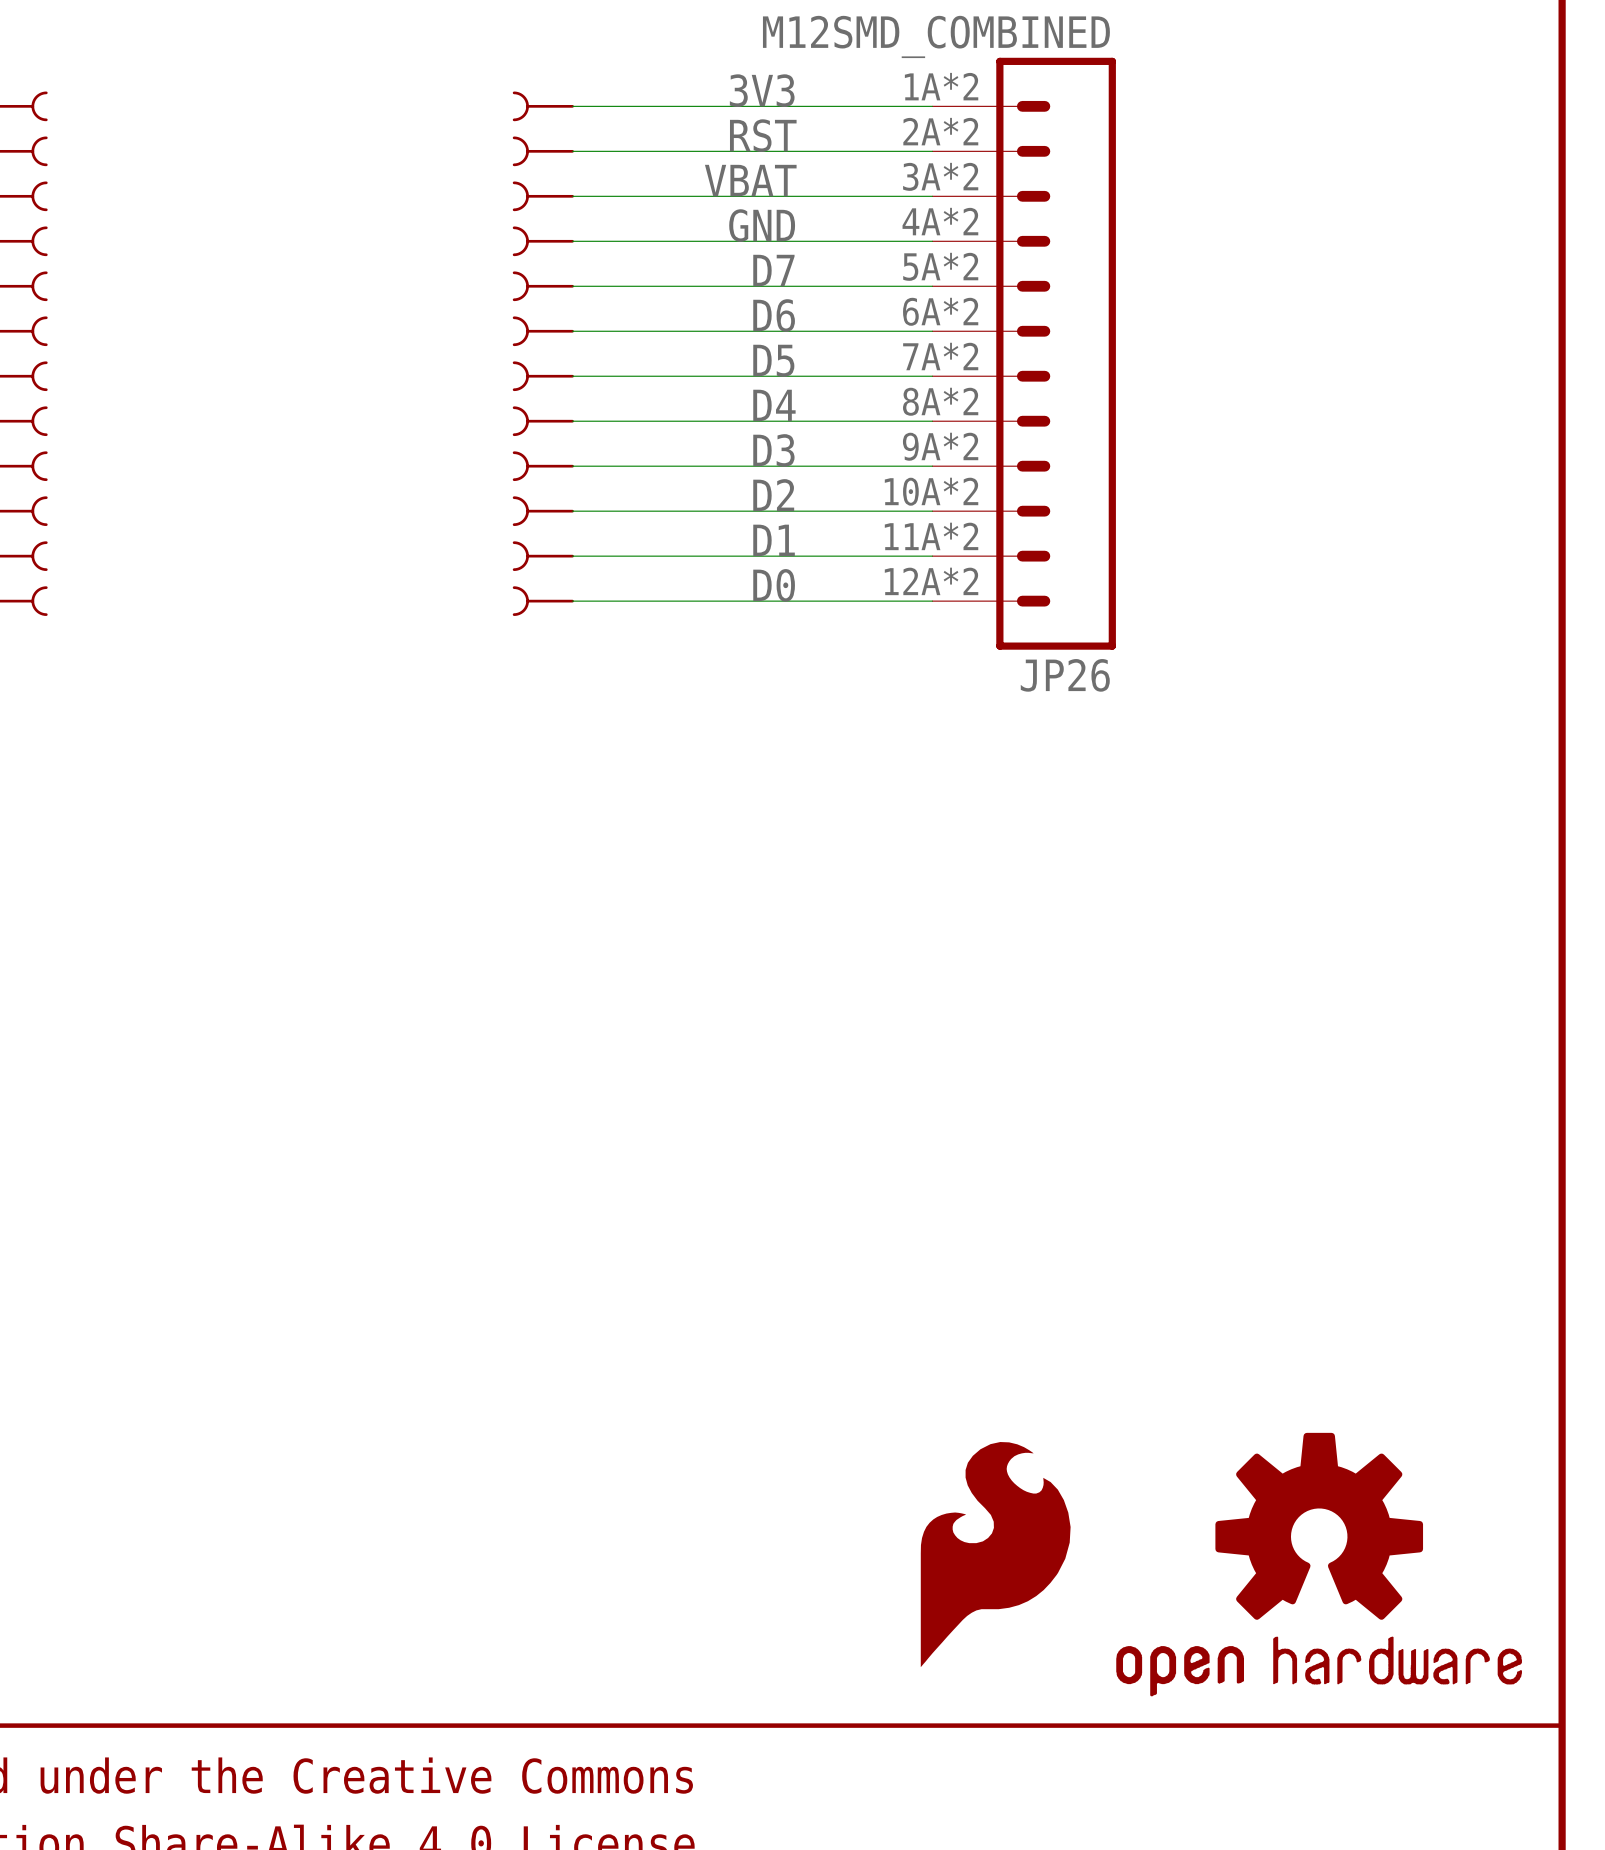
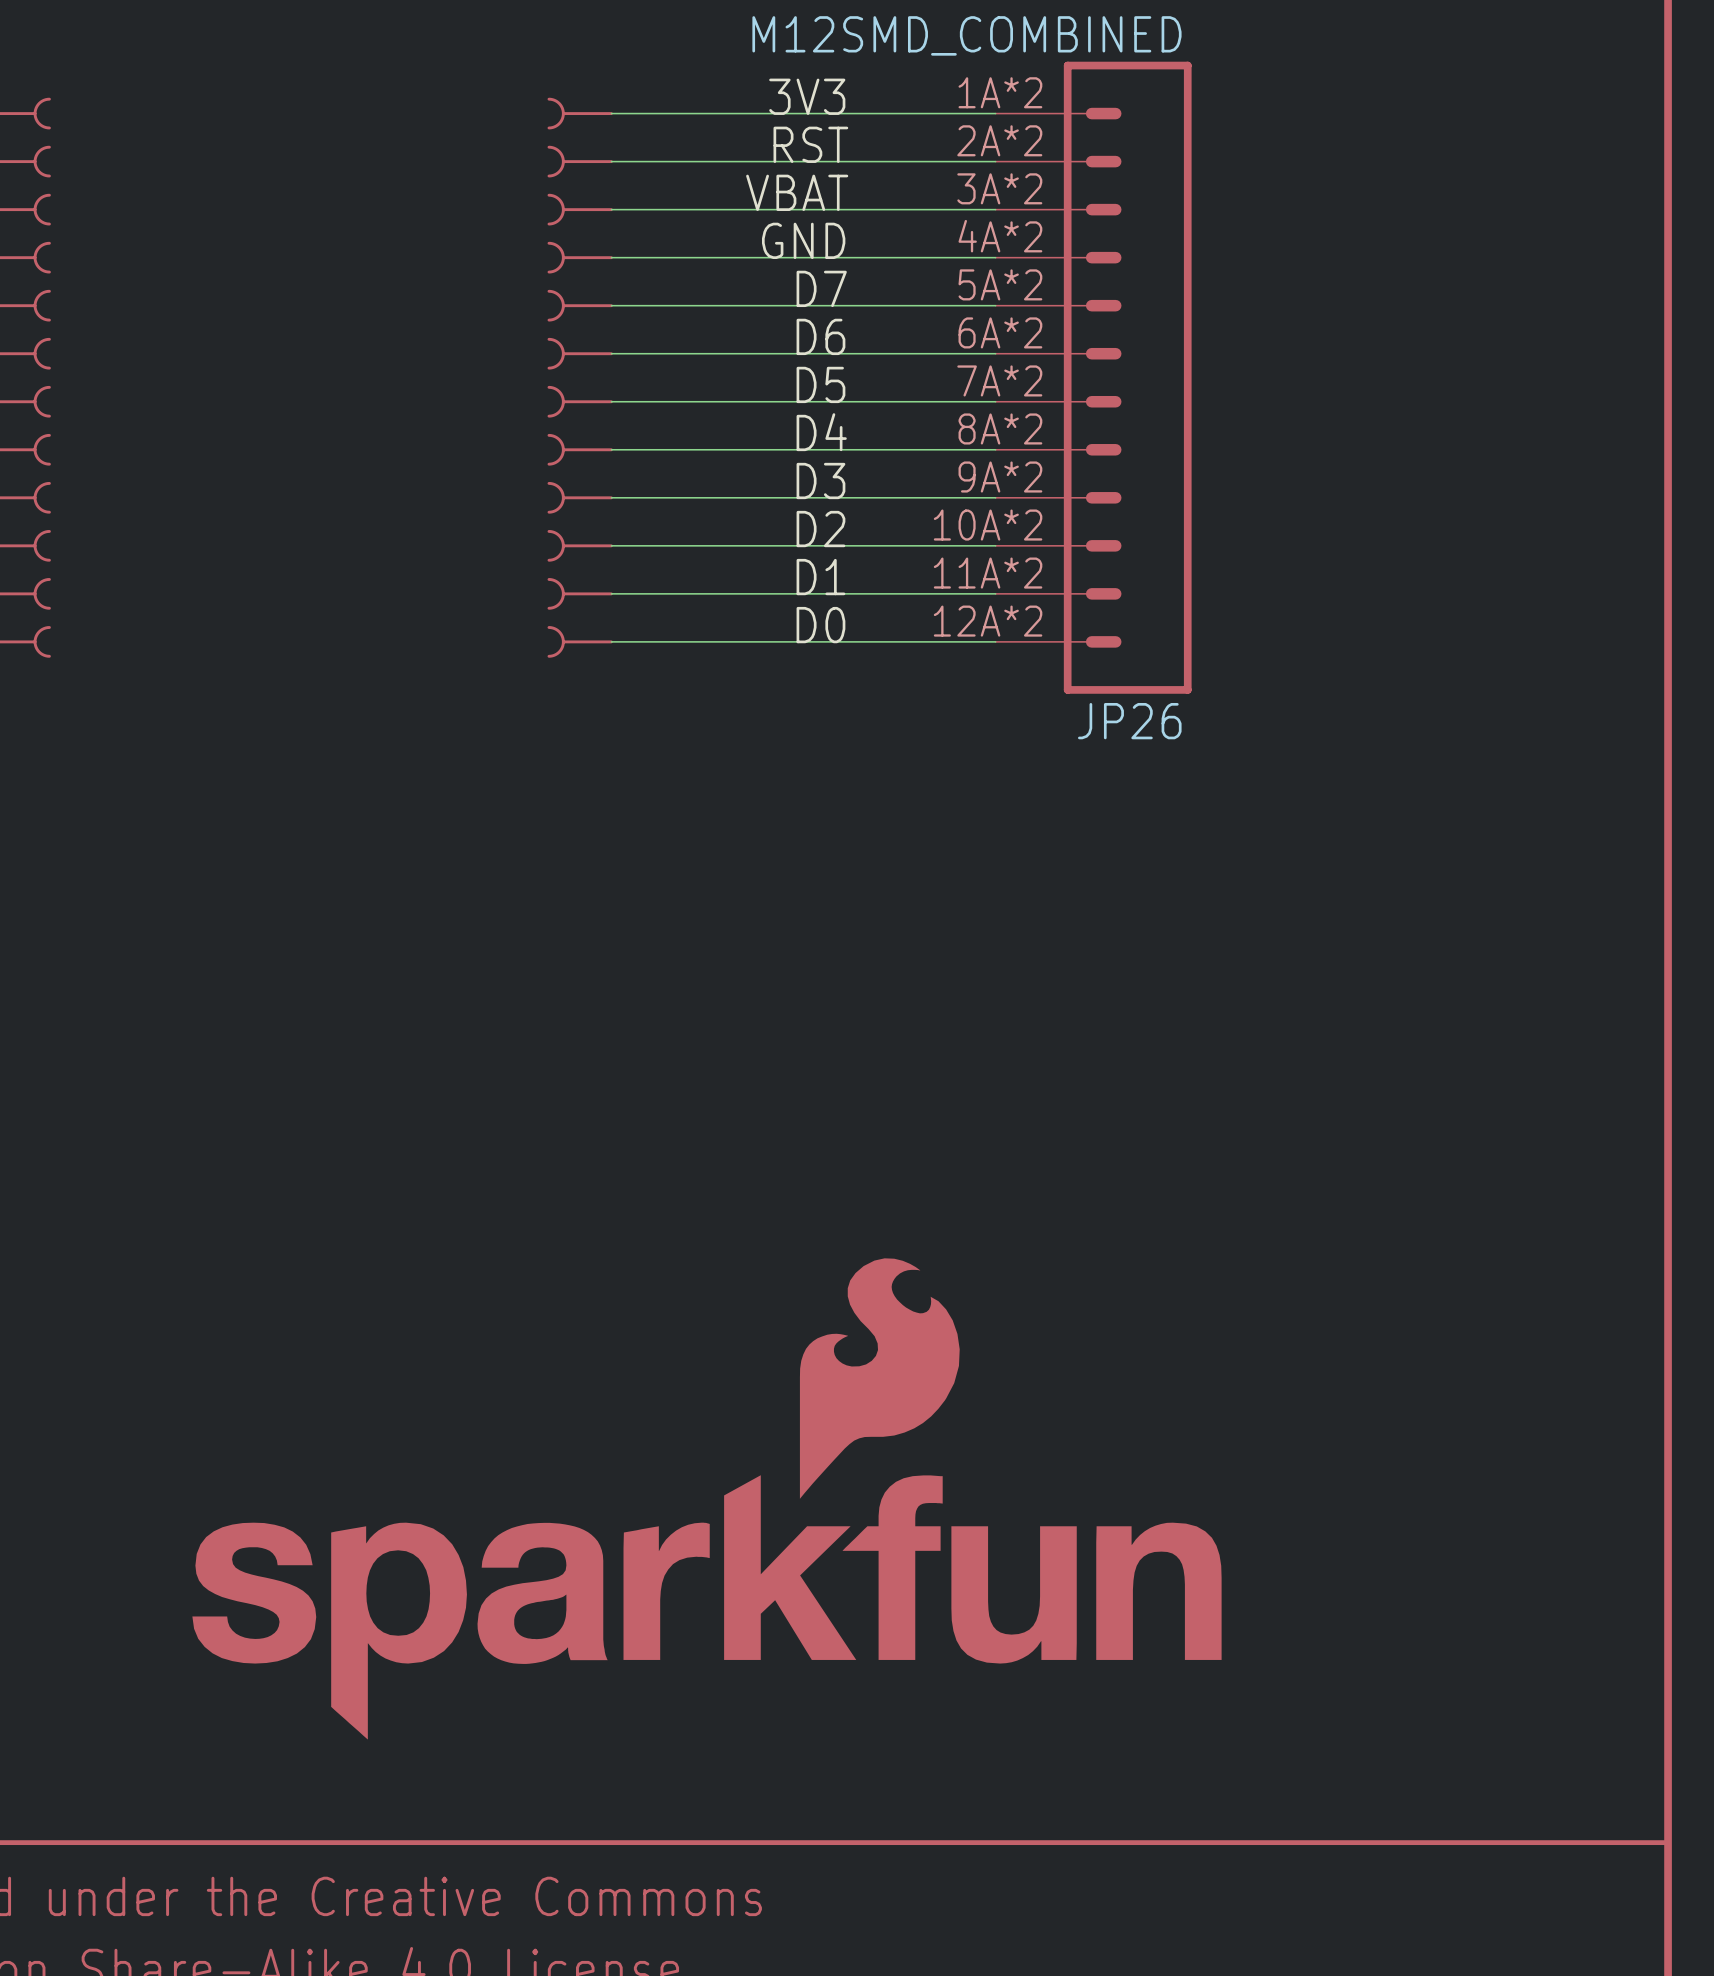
part: none -> (706, 1498)
part: (995, 1554) -> none
part: (1319, 1564) -> none

